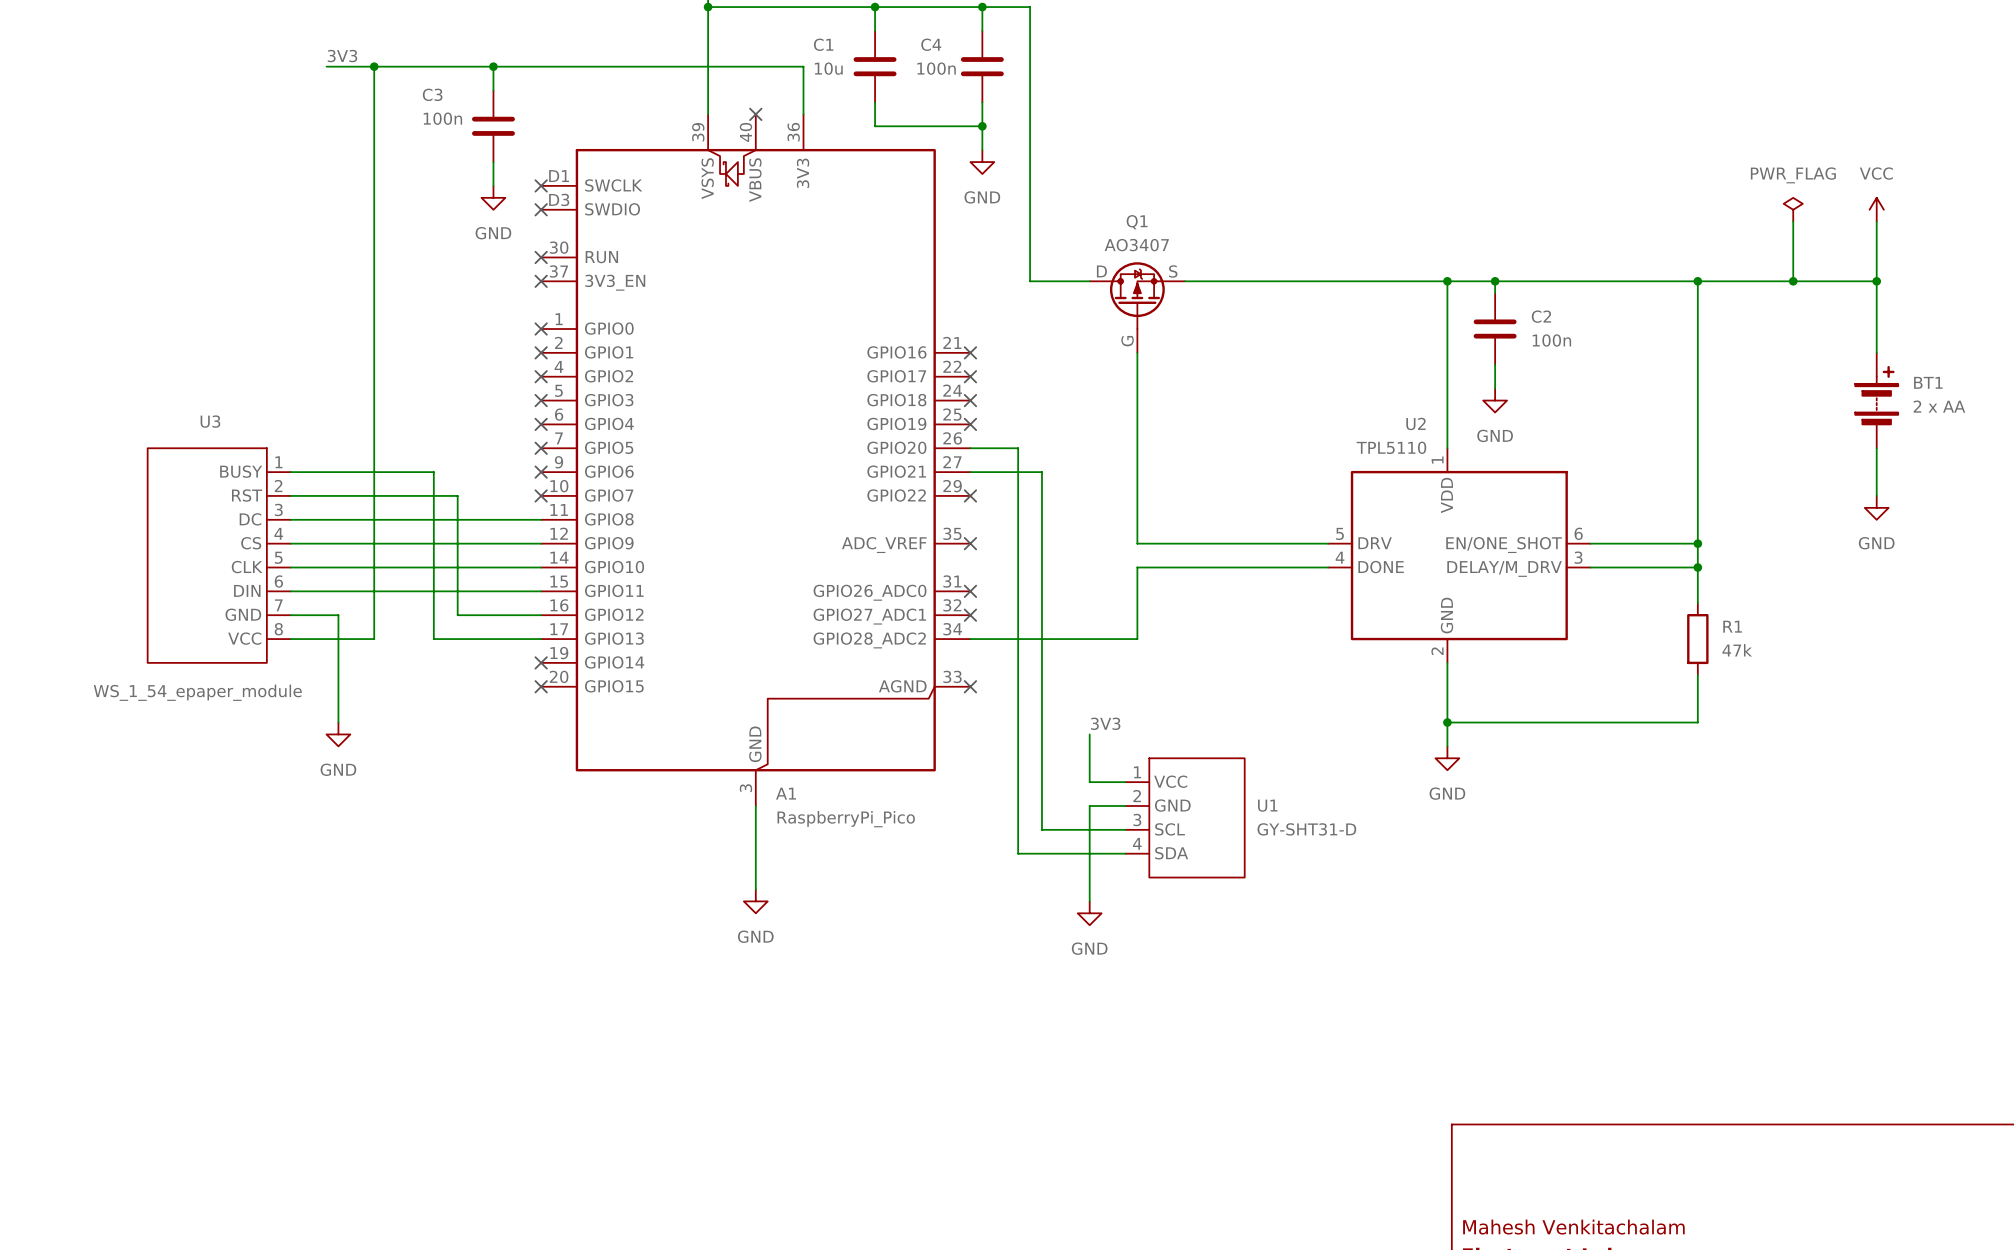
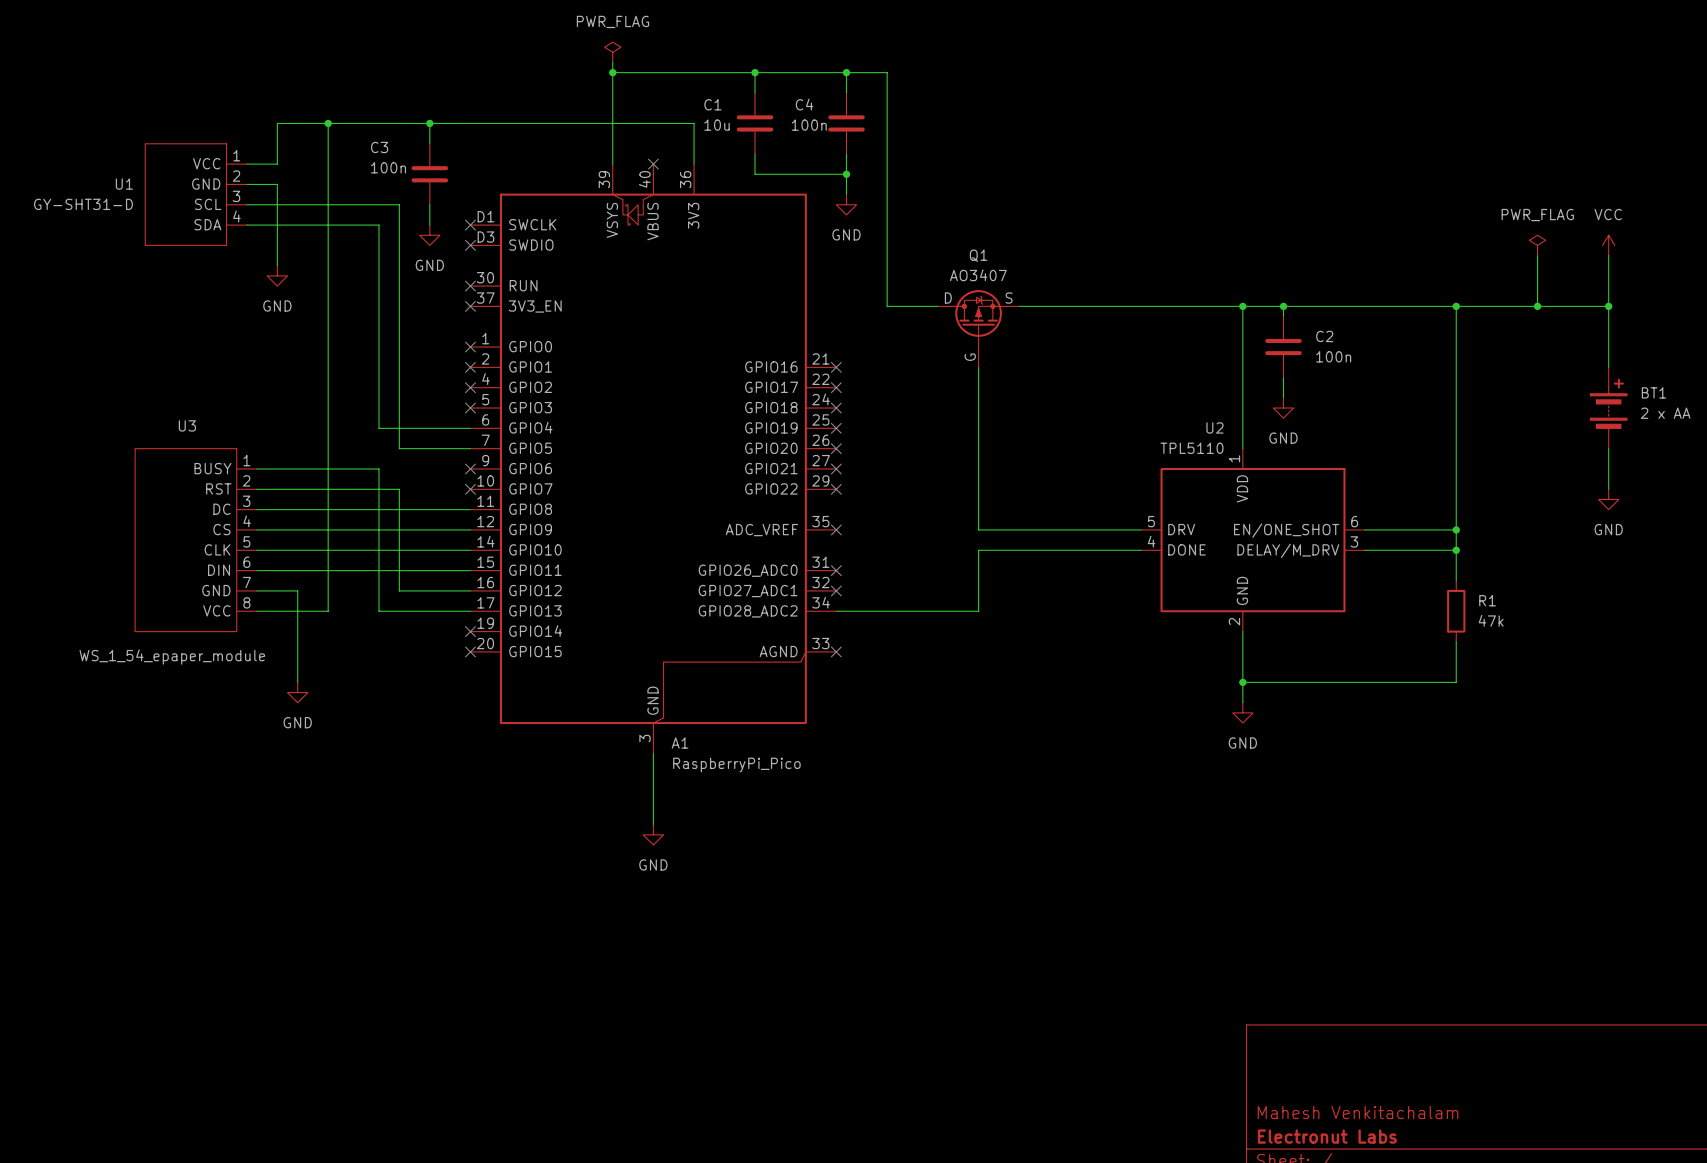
label: 3V3 (342, 56) -> none
wire: none -> (287, 123) (277, 123) (277, 164) (246, 164)
wire: none -> (246, 184) (277, 184) (277, 265)
wire: none -> (246, 204) (399, 204) (399, 448) (470, 448)
wire: none -> (246, 225) (379, 225) (379, 428) (470, 428)
power symbol: none -> GND (277, 275)
no-connect mark: (541, 424) -> none
no-connect mark: (541, 448) -> none
wire: (970, 448) (1018, 448) (1018, 853) (1125, 853) -> none
no-connect mark: none -> (836, 448)
wire: (970, 472) (1041, 472) (1041, 829) (1125, 829) -> none
no-connect mark: none -> (836, 468)
label: 3V3 (1105, 723) -> none
wire: (1089, 734) (1089, 782) (1125, 782) -> none
wire: (1125, 805) (1089, 805) (1089, 901) -> none
U1 position: (1185, 817) -> (196, 194)
U1 flip: as is (1197, 817) -> left-right (185, 194)
power symbol: GND (1089, 913) -> none

